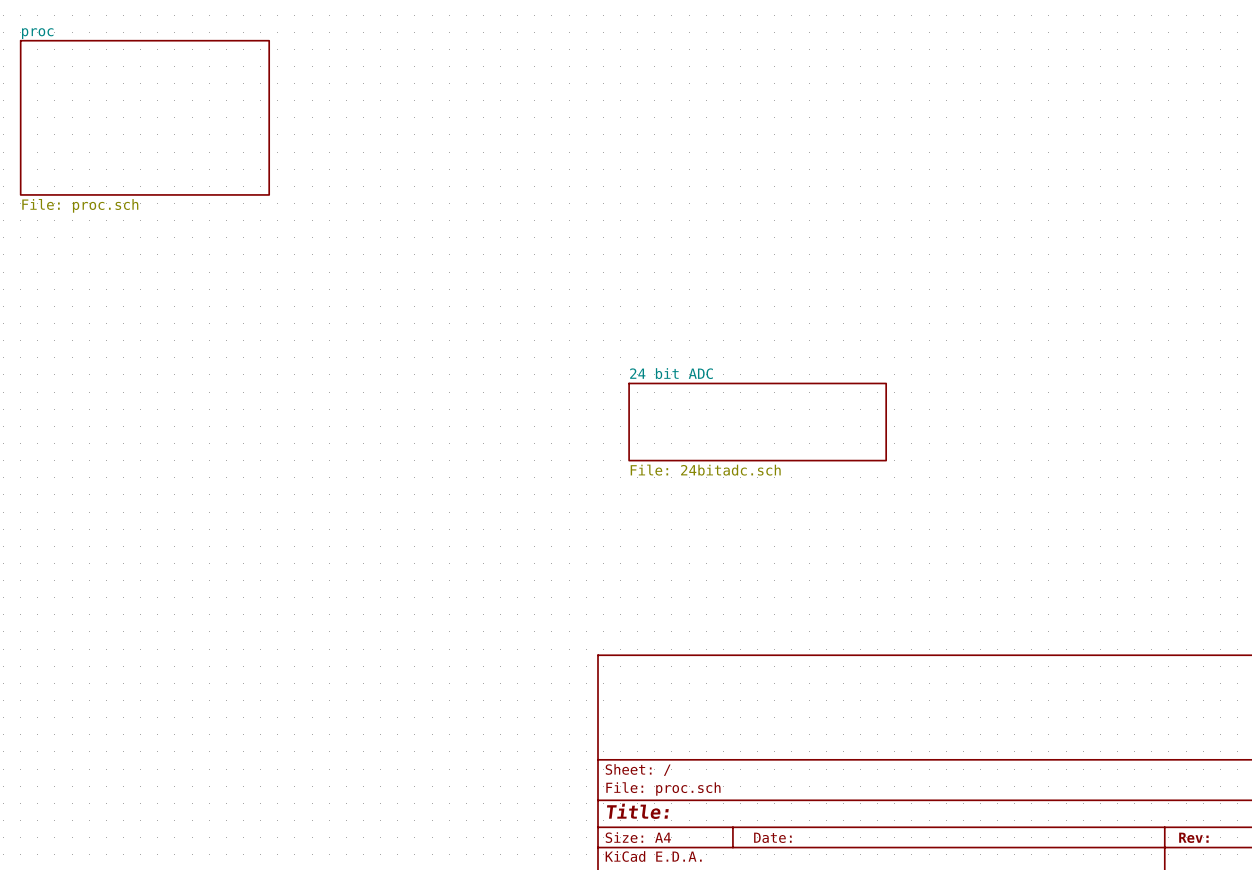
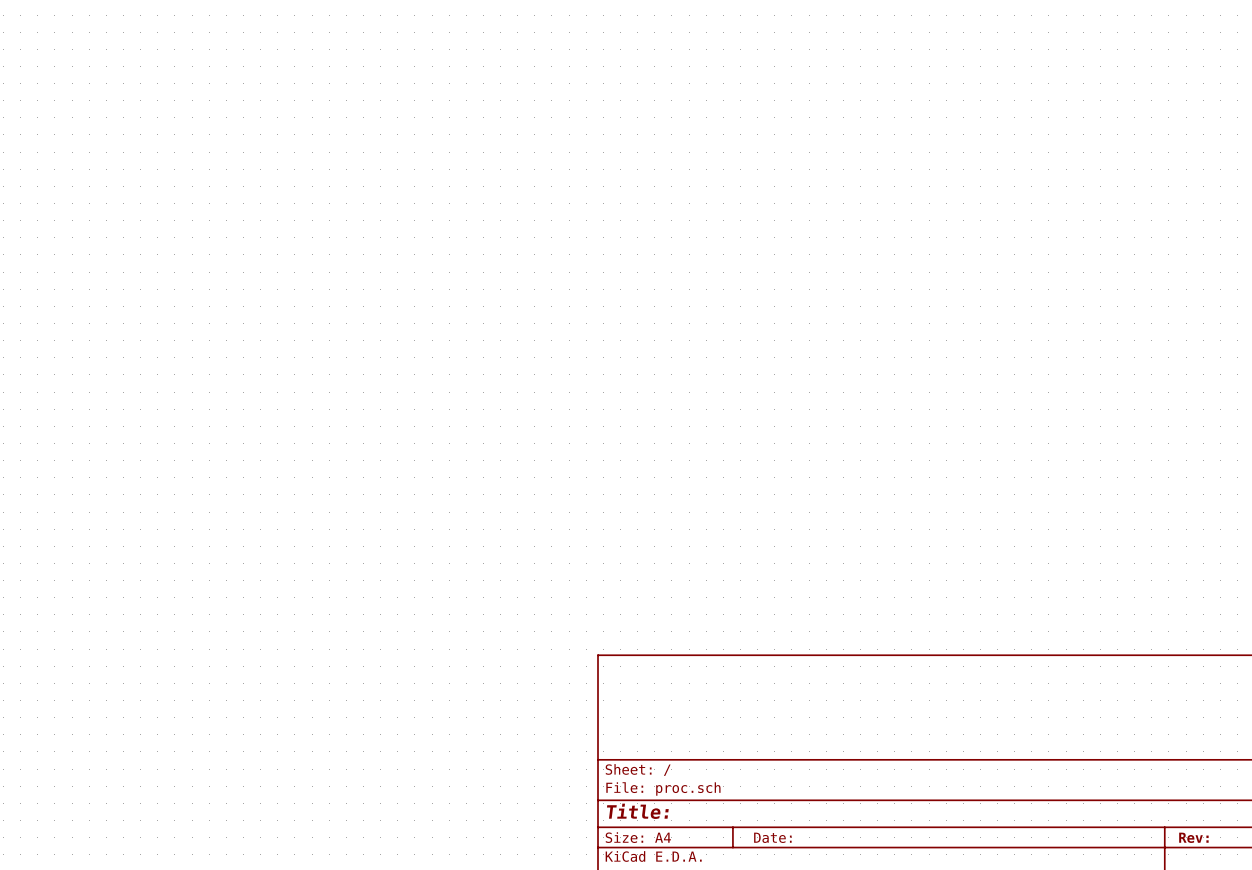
sheet proc: File: proc.sch (144, 117) -> none
sheet 24 bit ADC: File: 24bitadc.sch (757, 422) -> none

